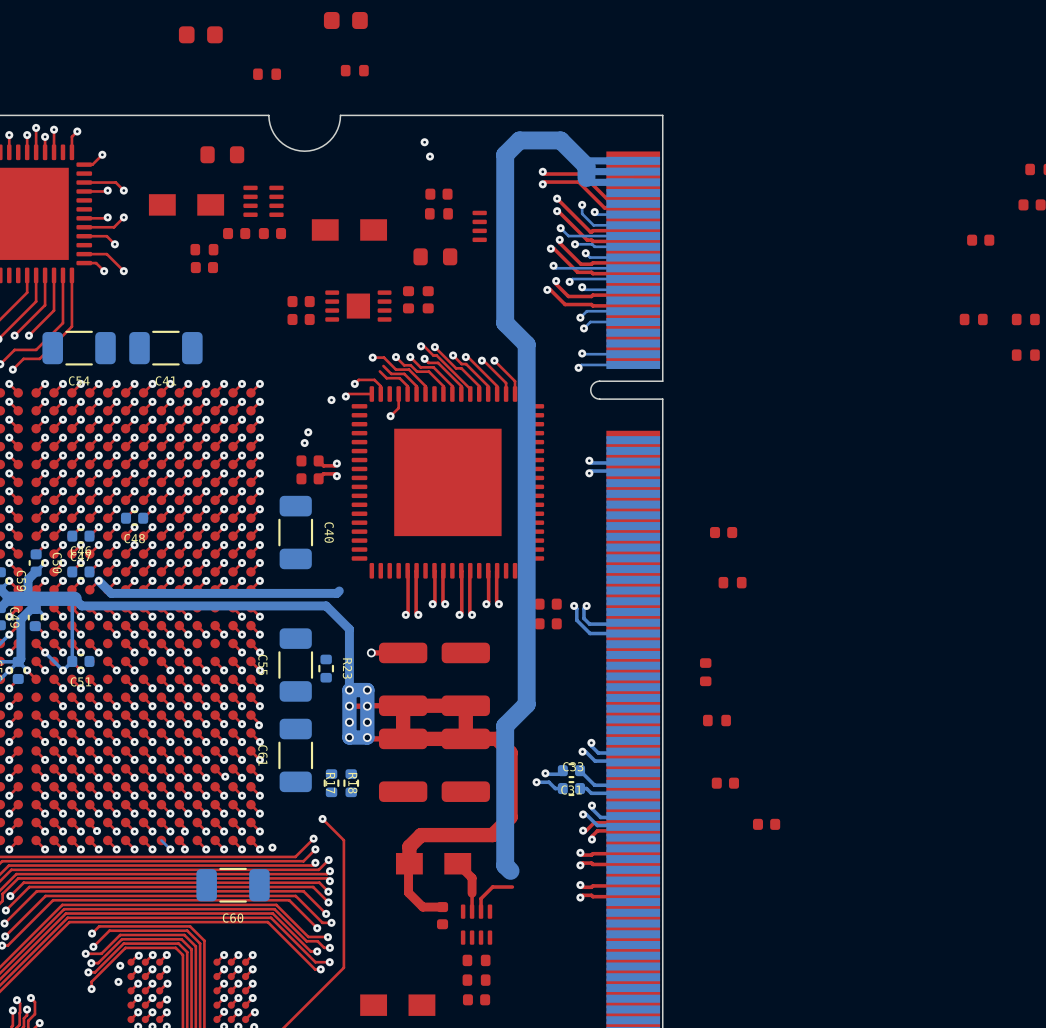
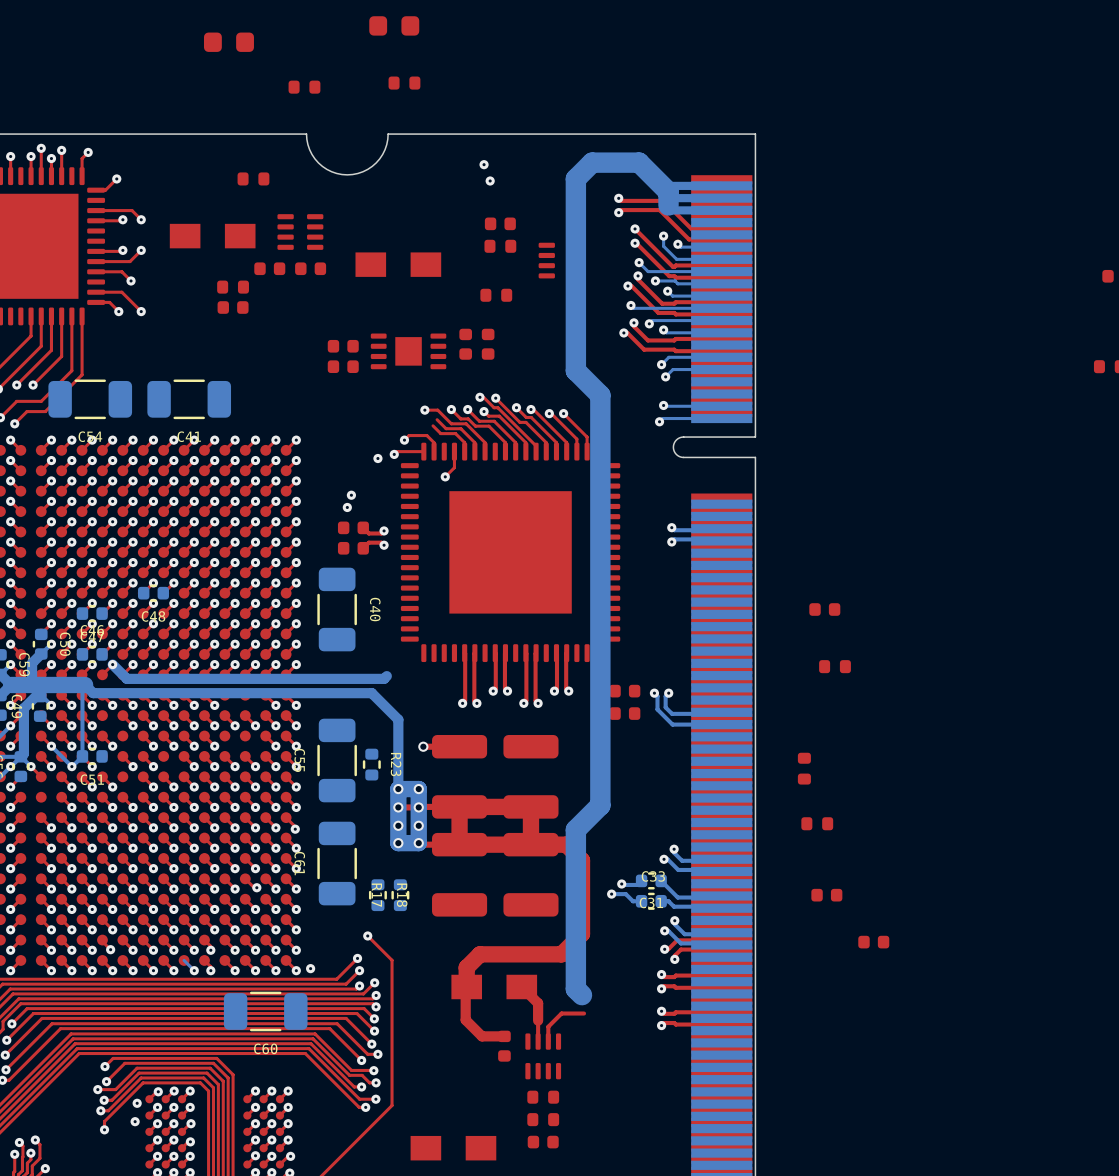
part footprint: [200, 146, 245, 164] -> [237, 172, 270, 186]
part footprint: [413, 248, 458, 266] -> [480, 288, 513, 302]

